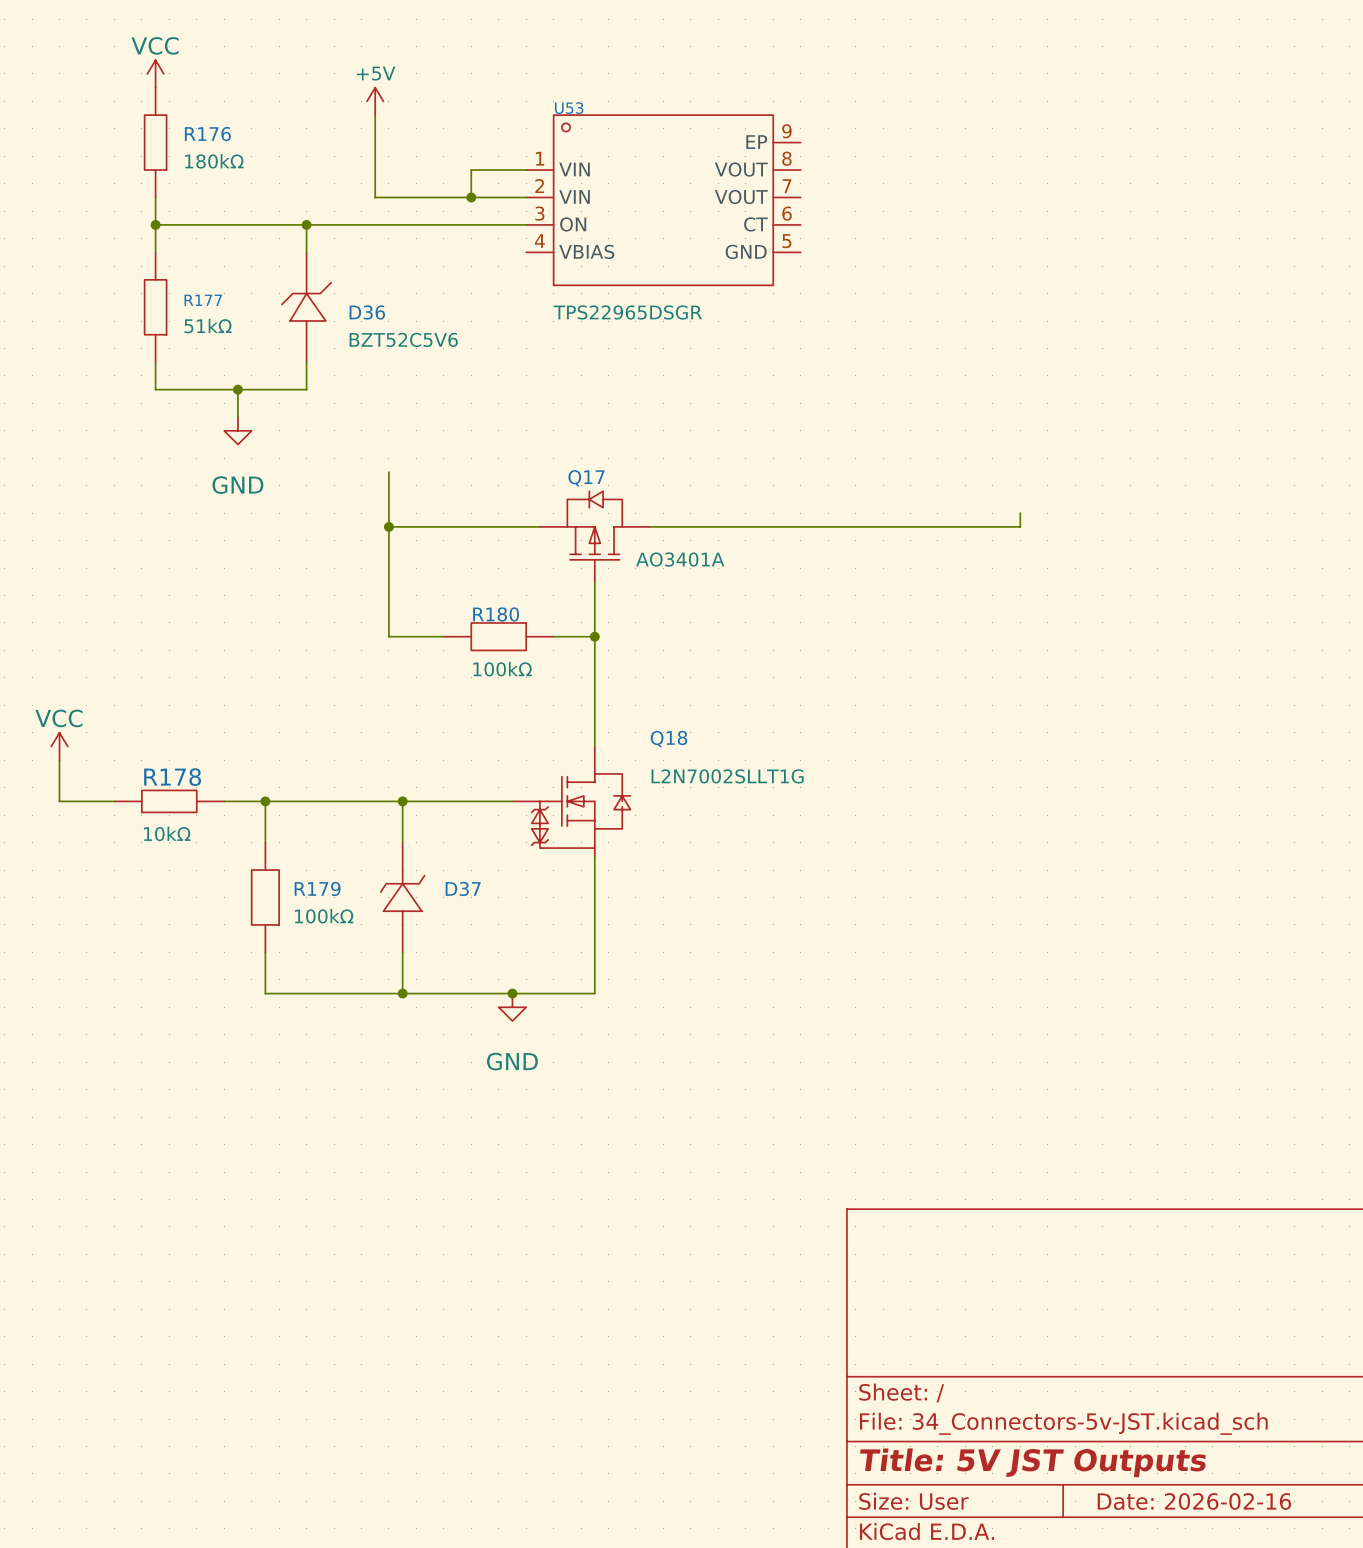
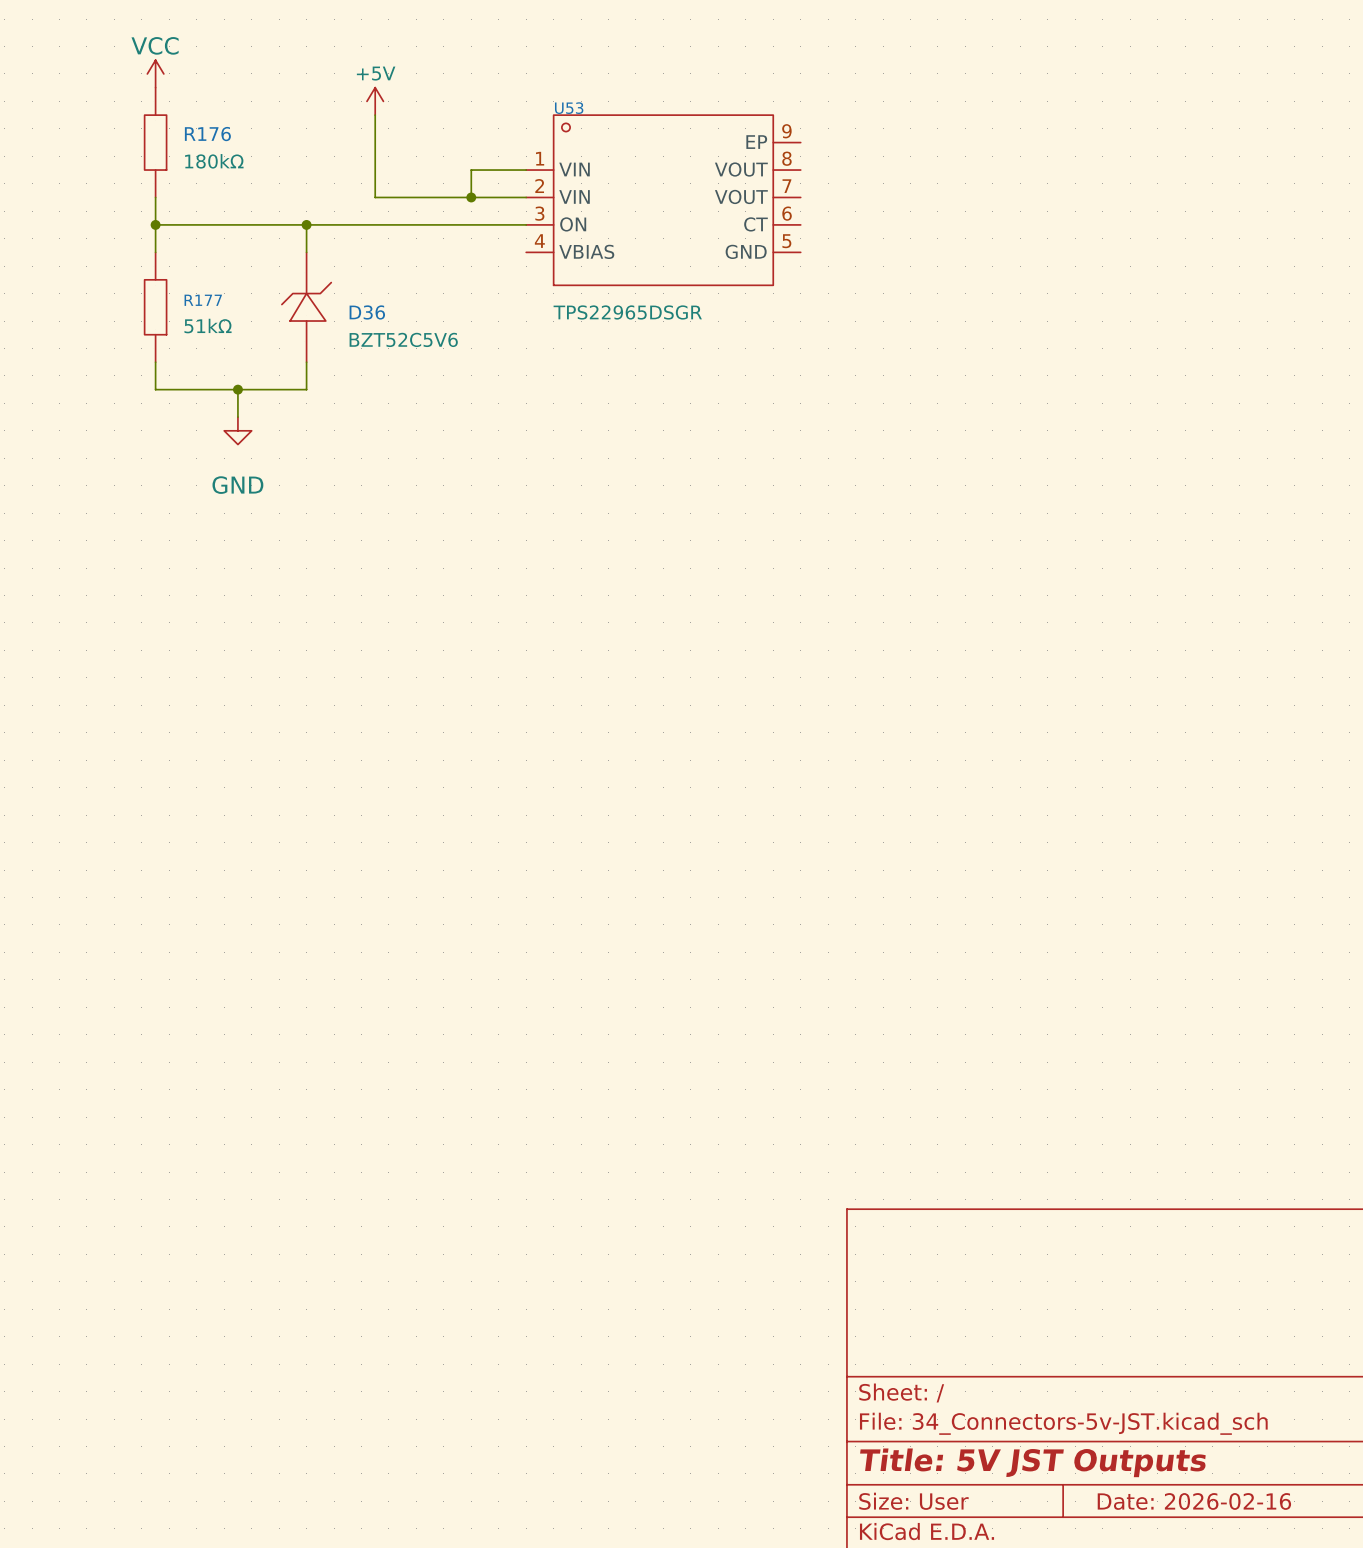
wire: (388, 471) (388, 636) (443, 636) -> none
wire: (1020, 513) (1020, 526) (649, 526) -> none
wire: (388, 526) (539, 526) -> none
junction: (388, 526) -> none
Q17: AO3401A (594, 536) -> none
wire: (594, 581) (594, 746) -> none
R180: 100kΩ (498, 636) -> none
wire: (553, 636) (594, 636) -> none
junction: (594, 636) -> none
power symbol: VCC (59, 746) -> none
wire: (59, 760) (59, 801) (114, 801) -> none
R178: 10kΩ (169, 801) -> none
wire: (224, 801) (512, 801) -> none
wire: (265, 801) (265, 842) -> none
junction: (265, 801) -> none
wire: (402, 801) (402, 842) -> none
junction: (402, 801) -> none
Q18: L2N7002SLLT1G (571, 801) -> none
wire: (594, 856) (594, 993) (265, 993) (265, 952) -> none
R179: 100kΩ (265, 897) -> none
D37: (402, 897) -> none
wire: (402, 952) (402, 993) -> none
junction: (402, 993) -> none
junction: (512, 993) -> none
power symbol: GND (512, 1007) -> none

